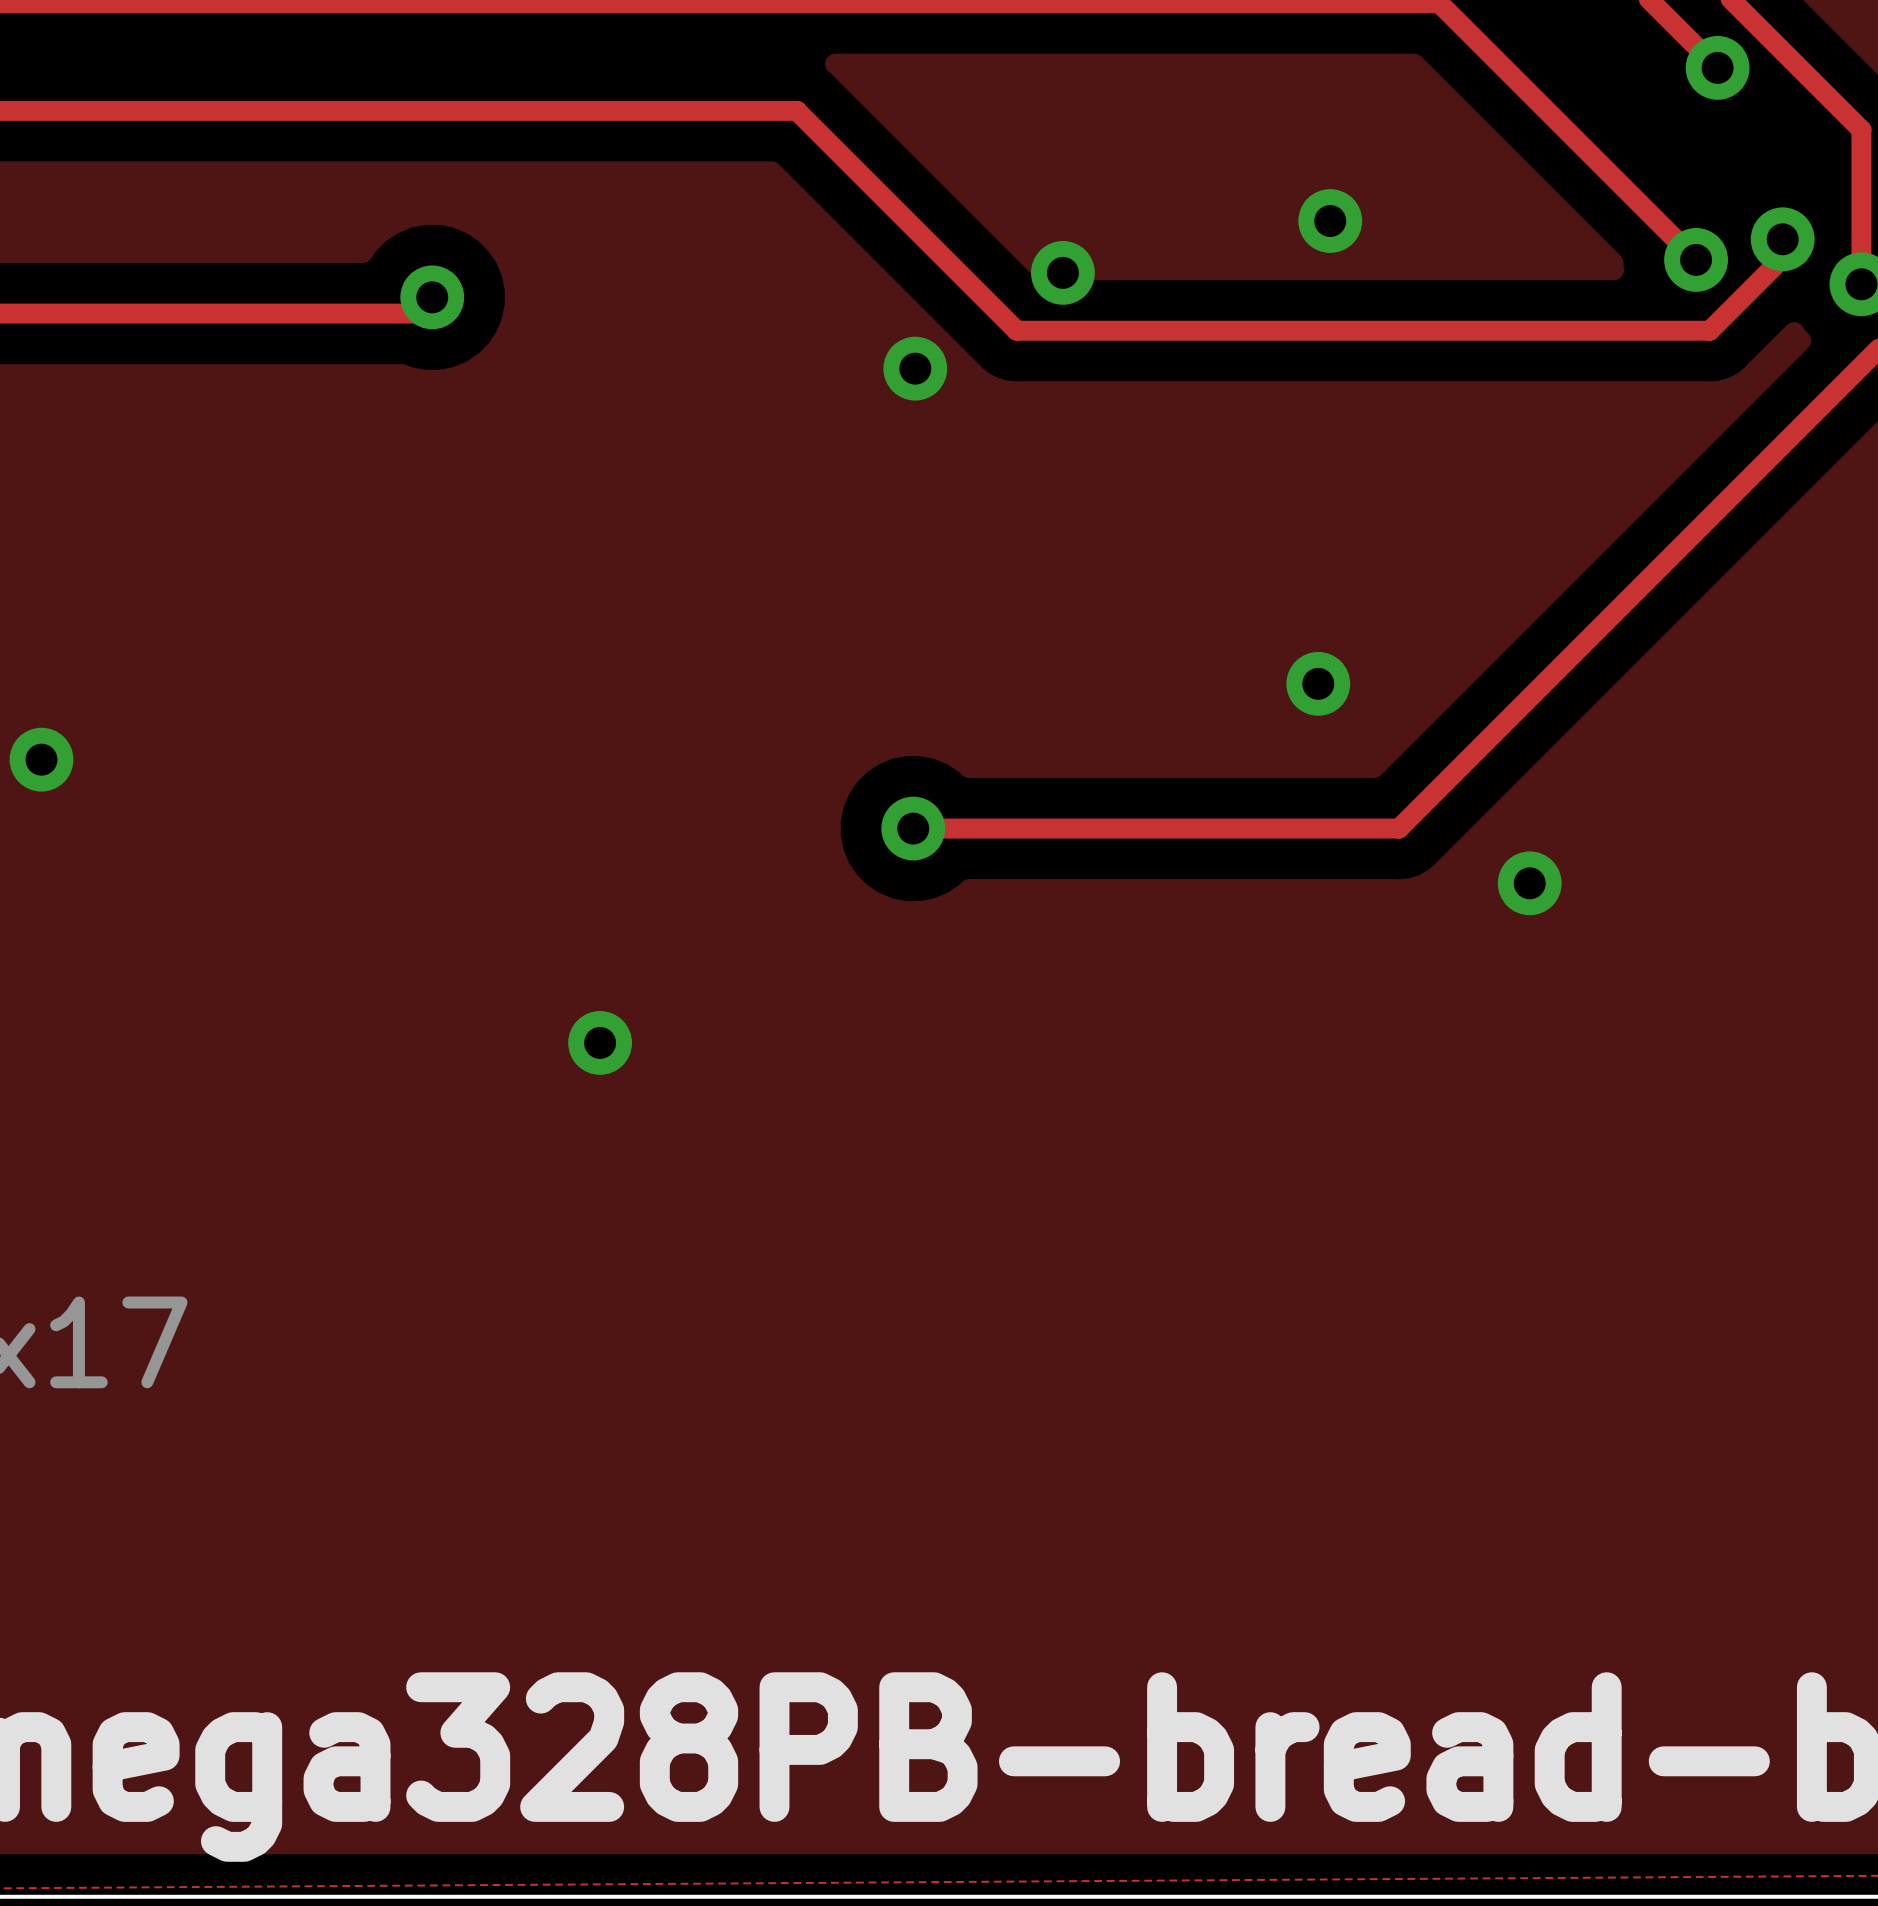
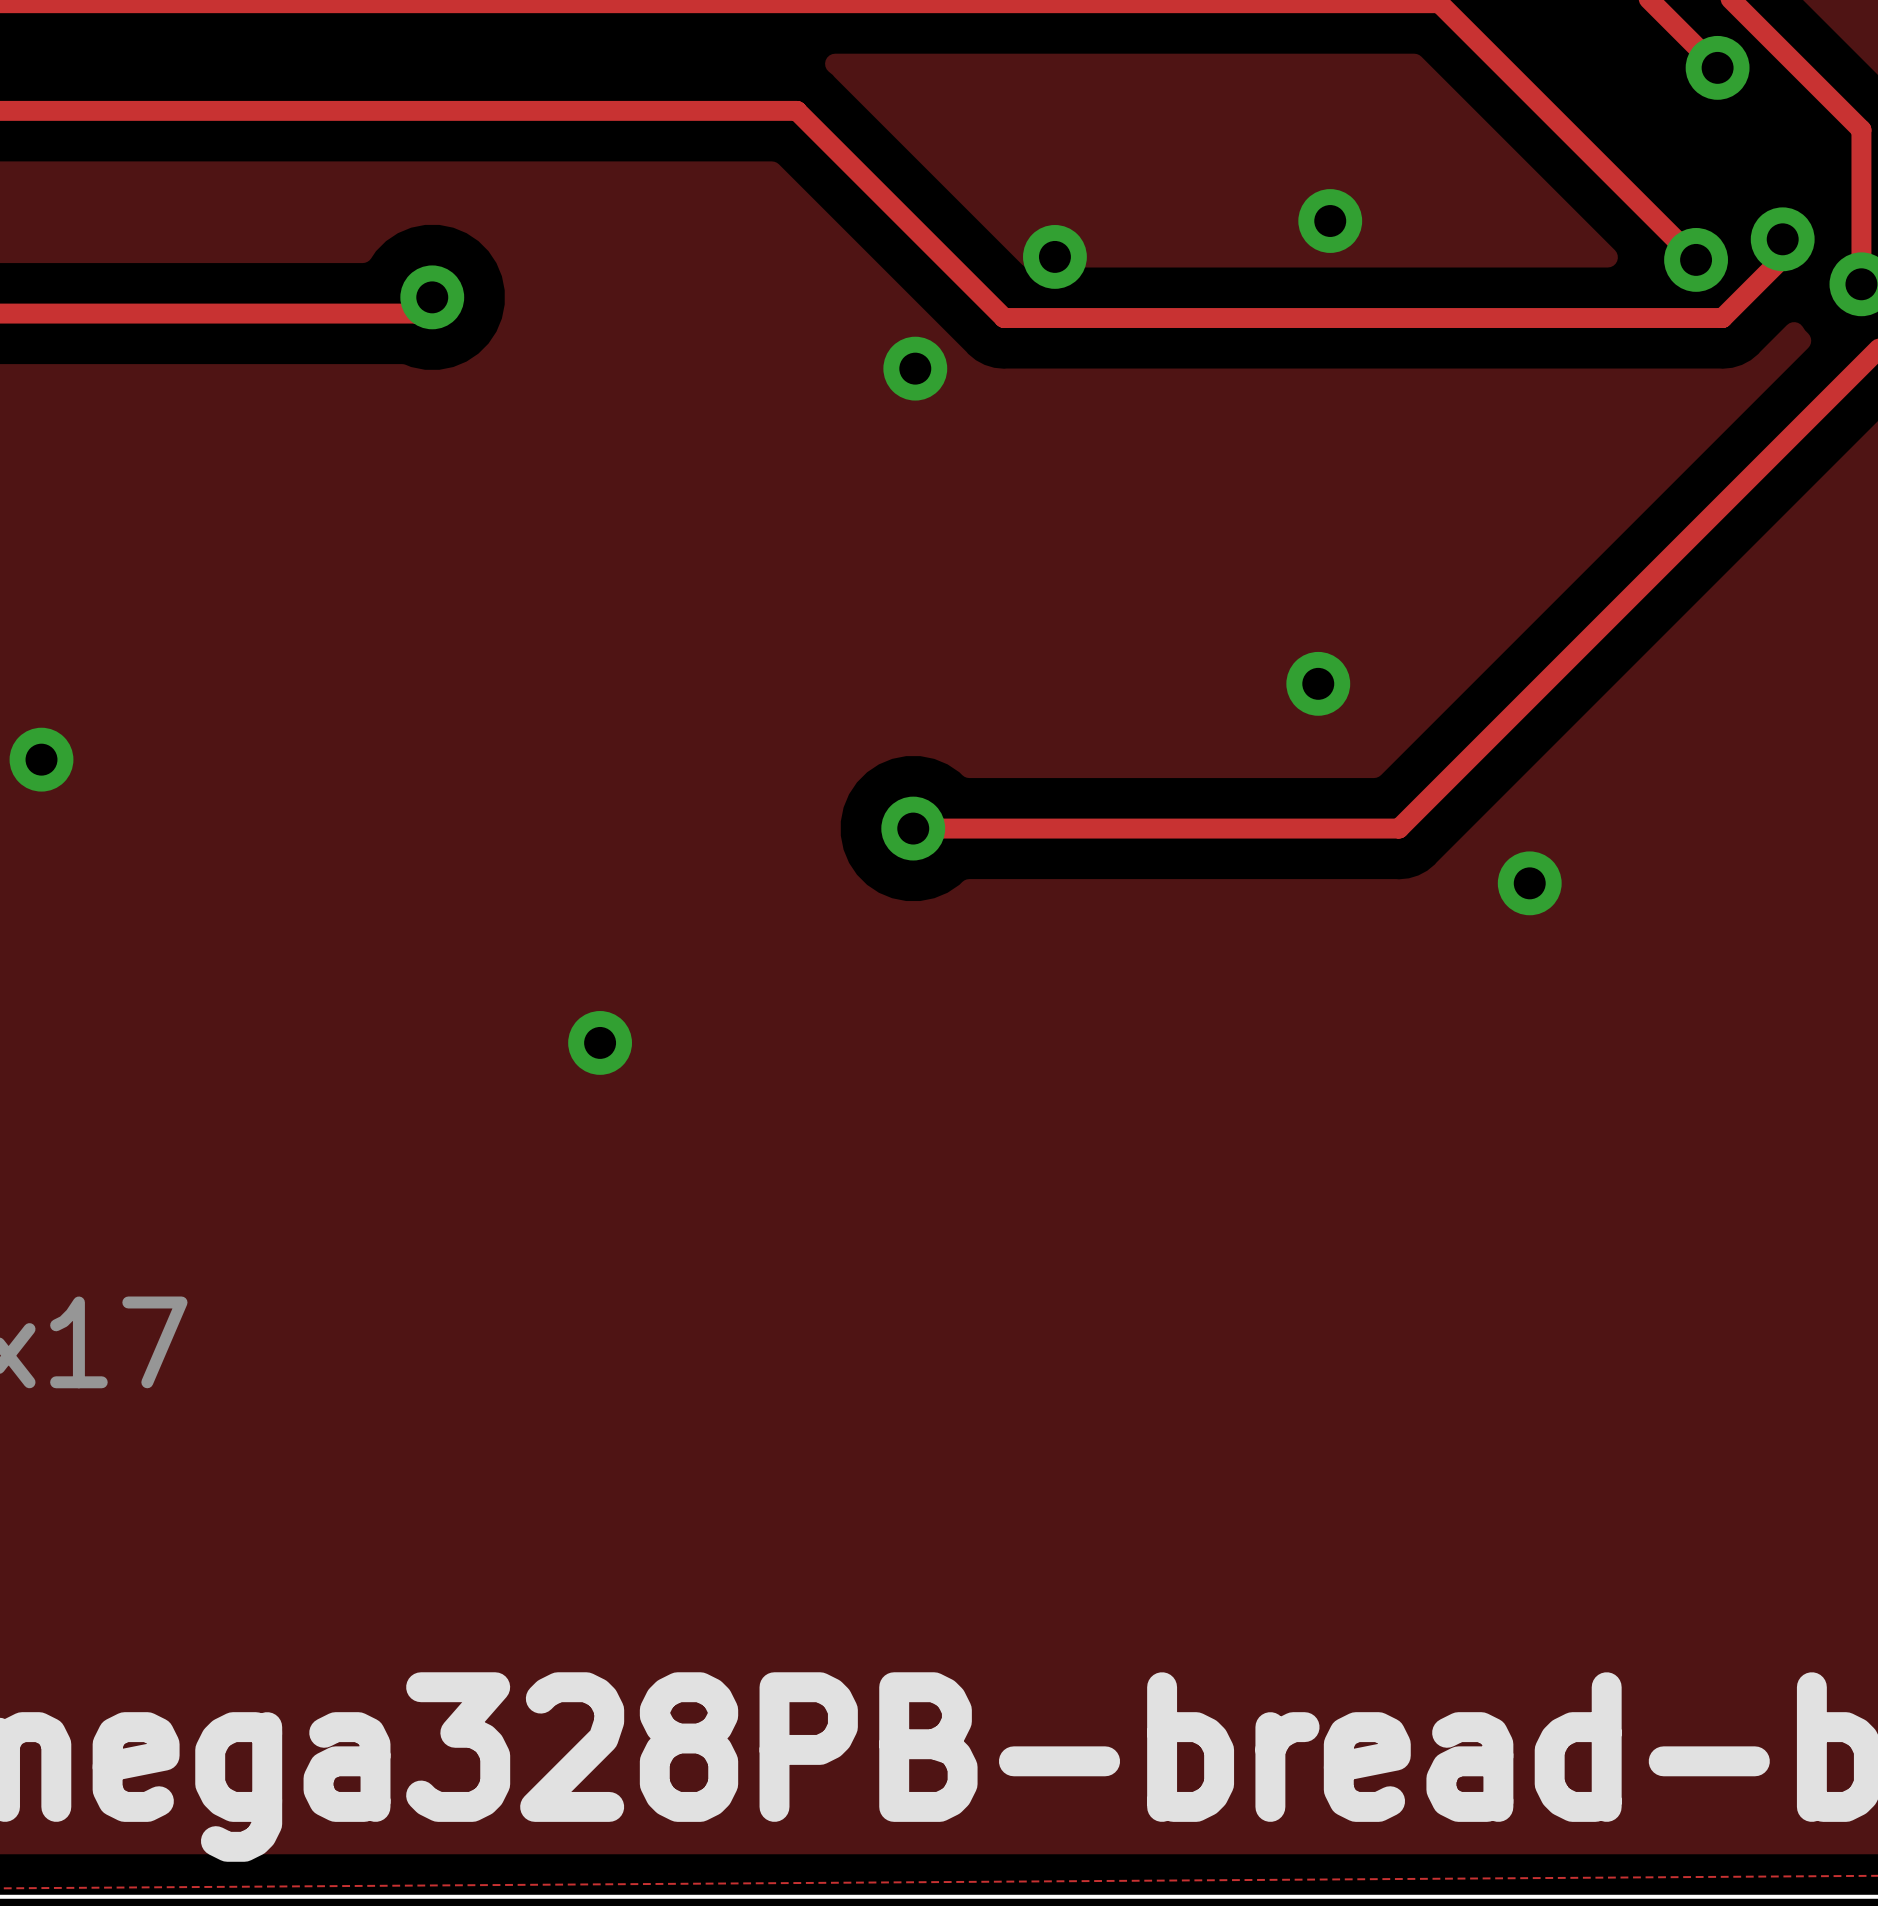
via position: (1062, 272) -> (1054, 256)
track: (1004, 318) (1016, 330) (1709, 330) (1722, 318) -> (1004, 318) (1722, 318)

